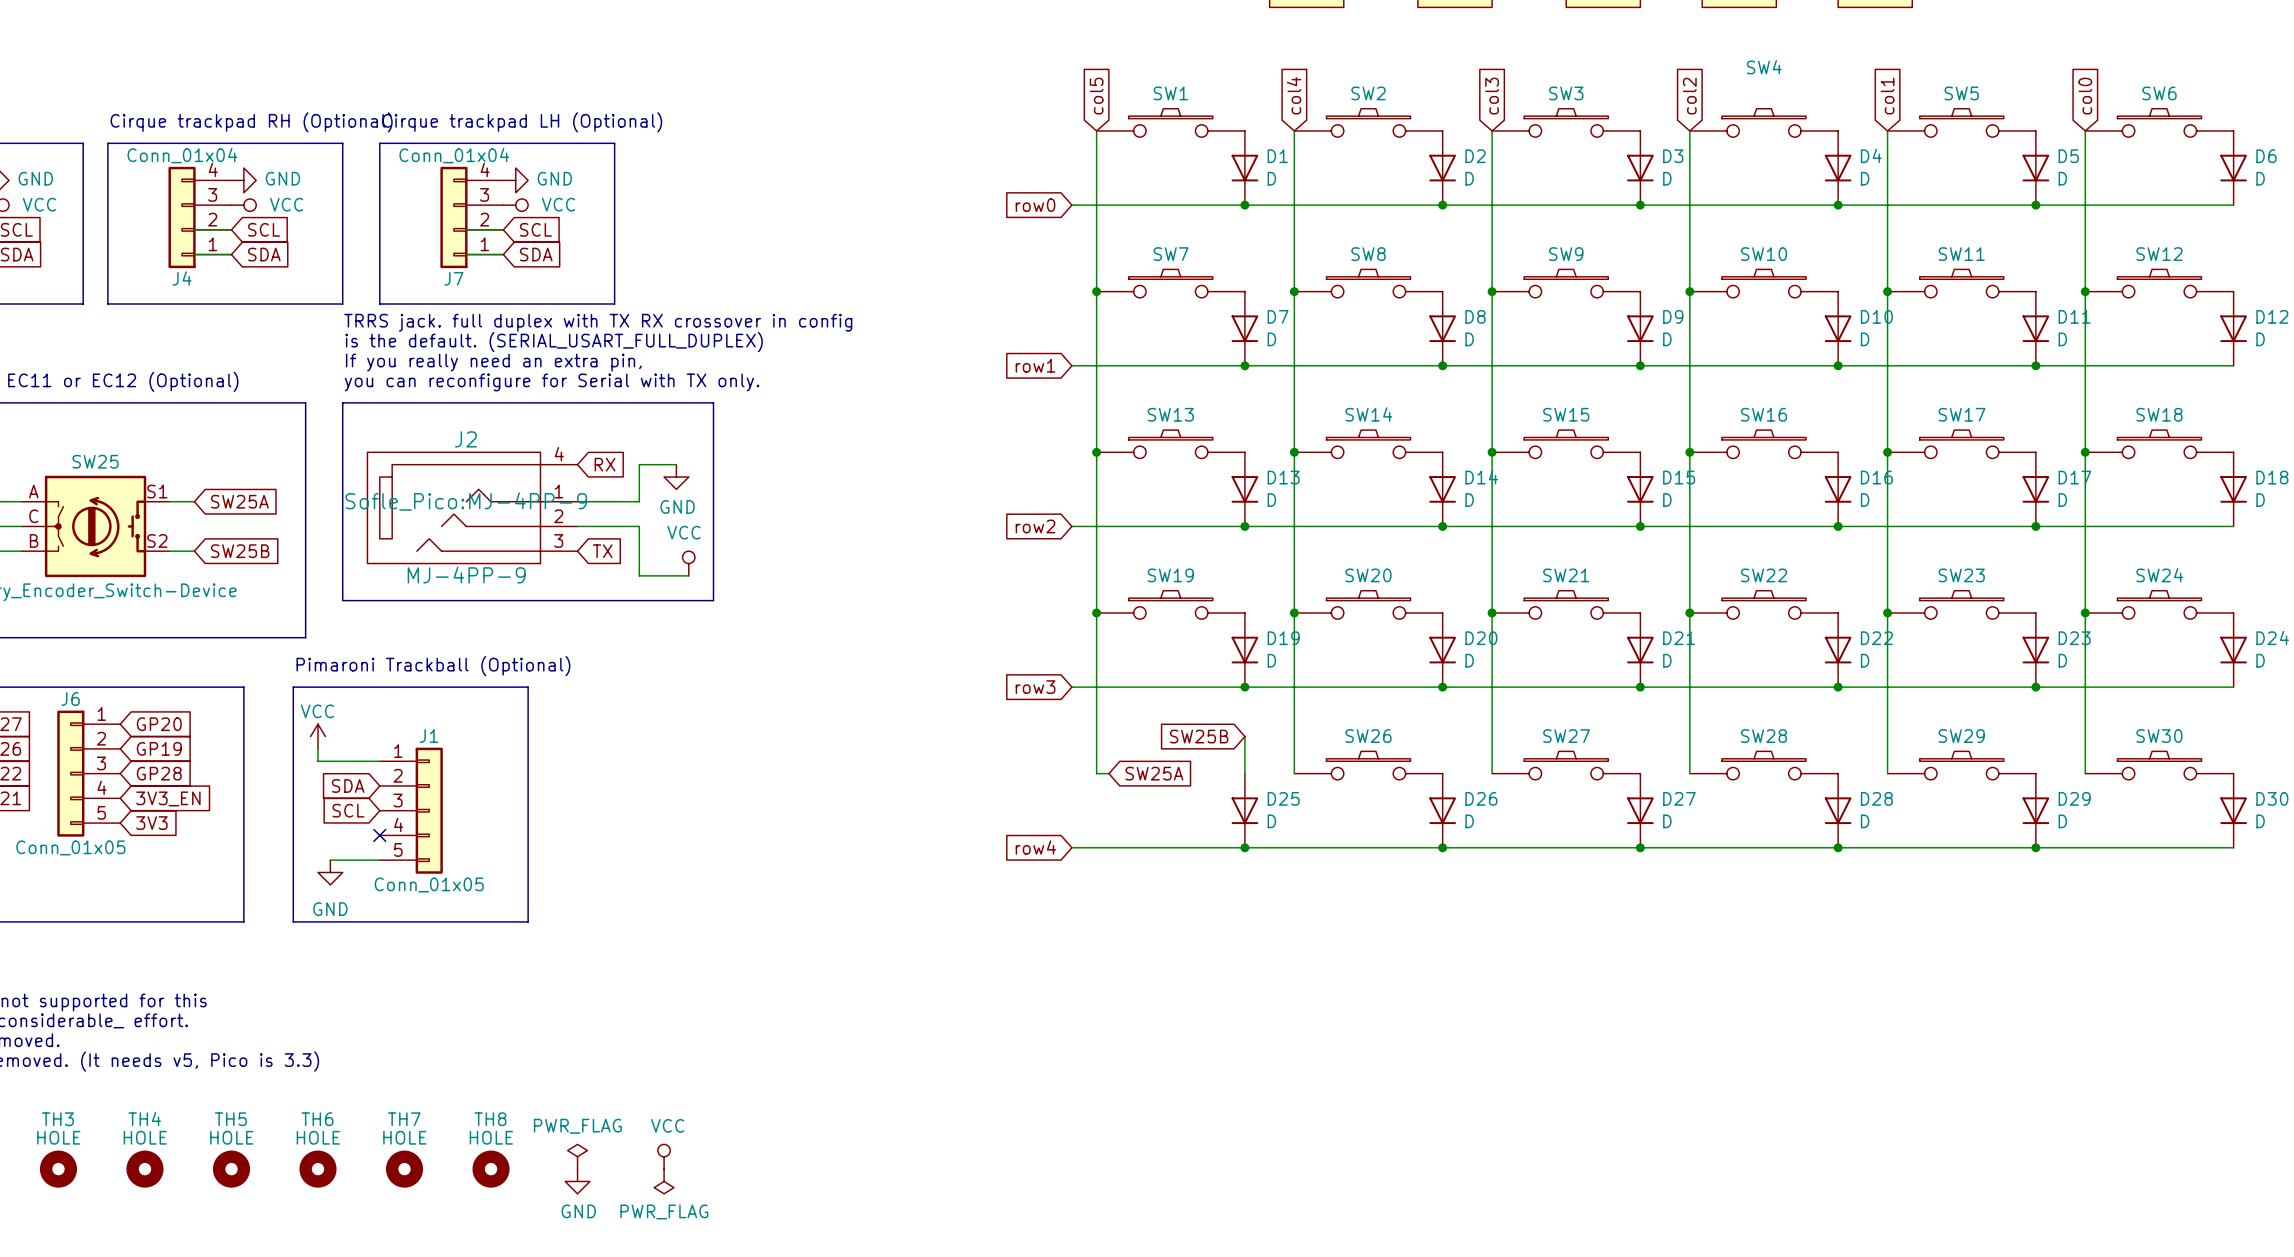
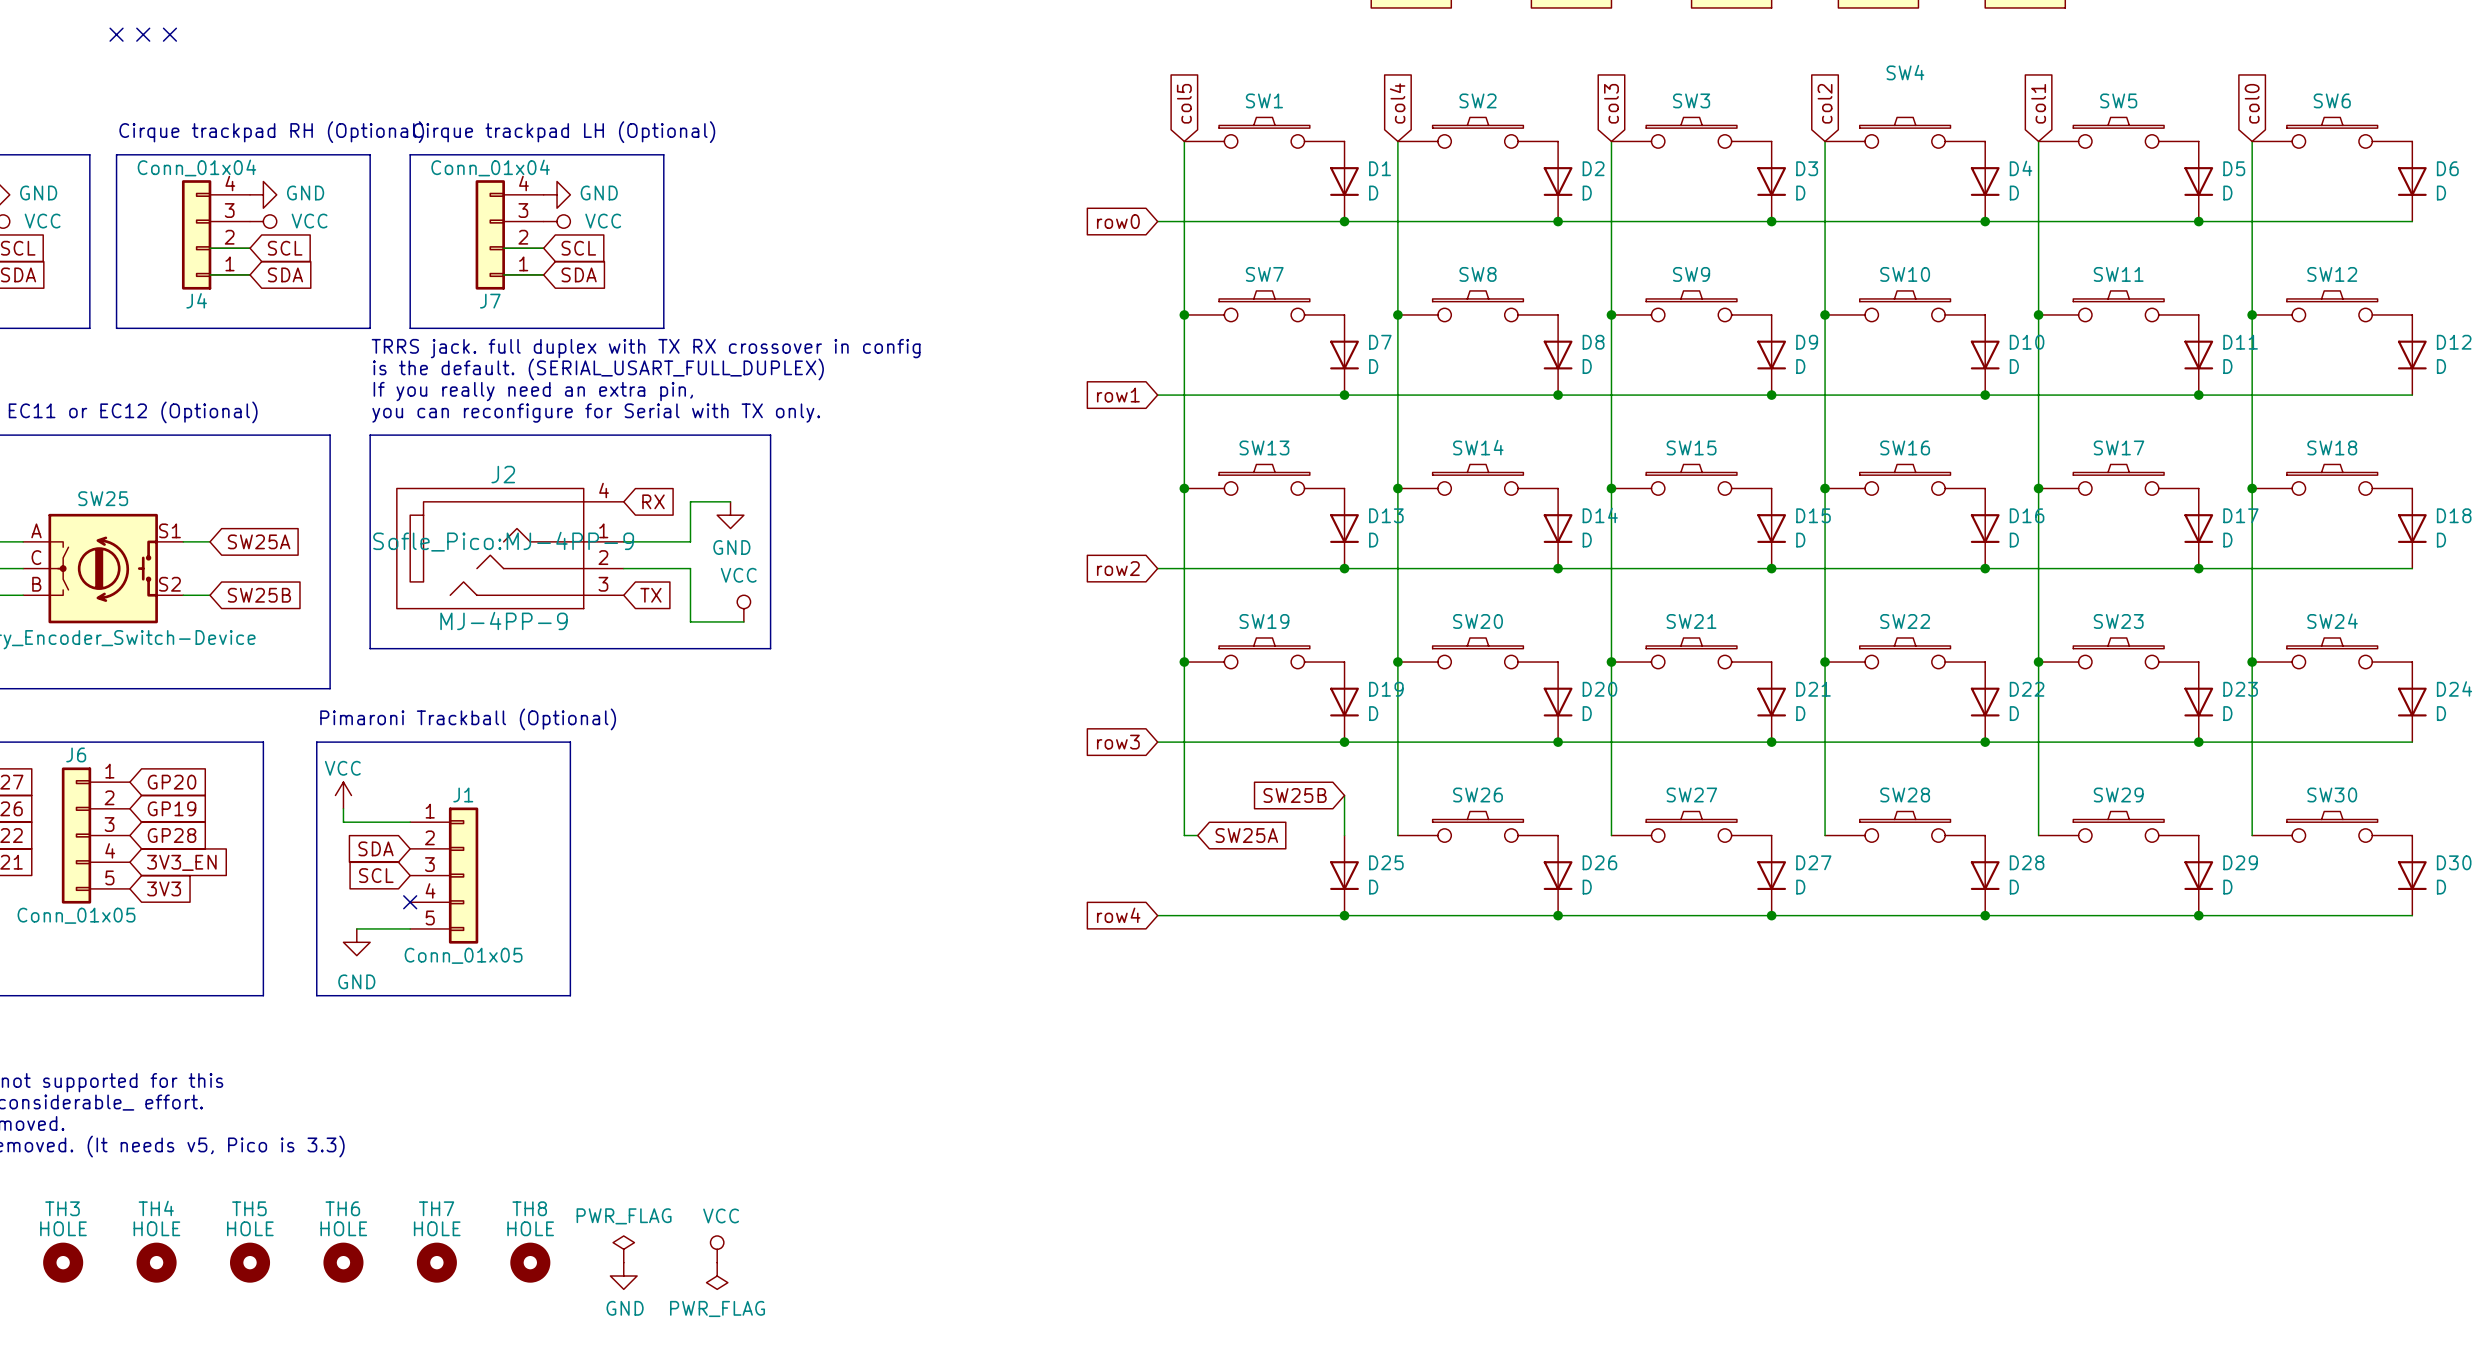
no-connect mark: none -> (116, 34)
no-connect mark: none -> (143, 34)
no-connect mark: none -> (169, 34)

